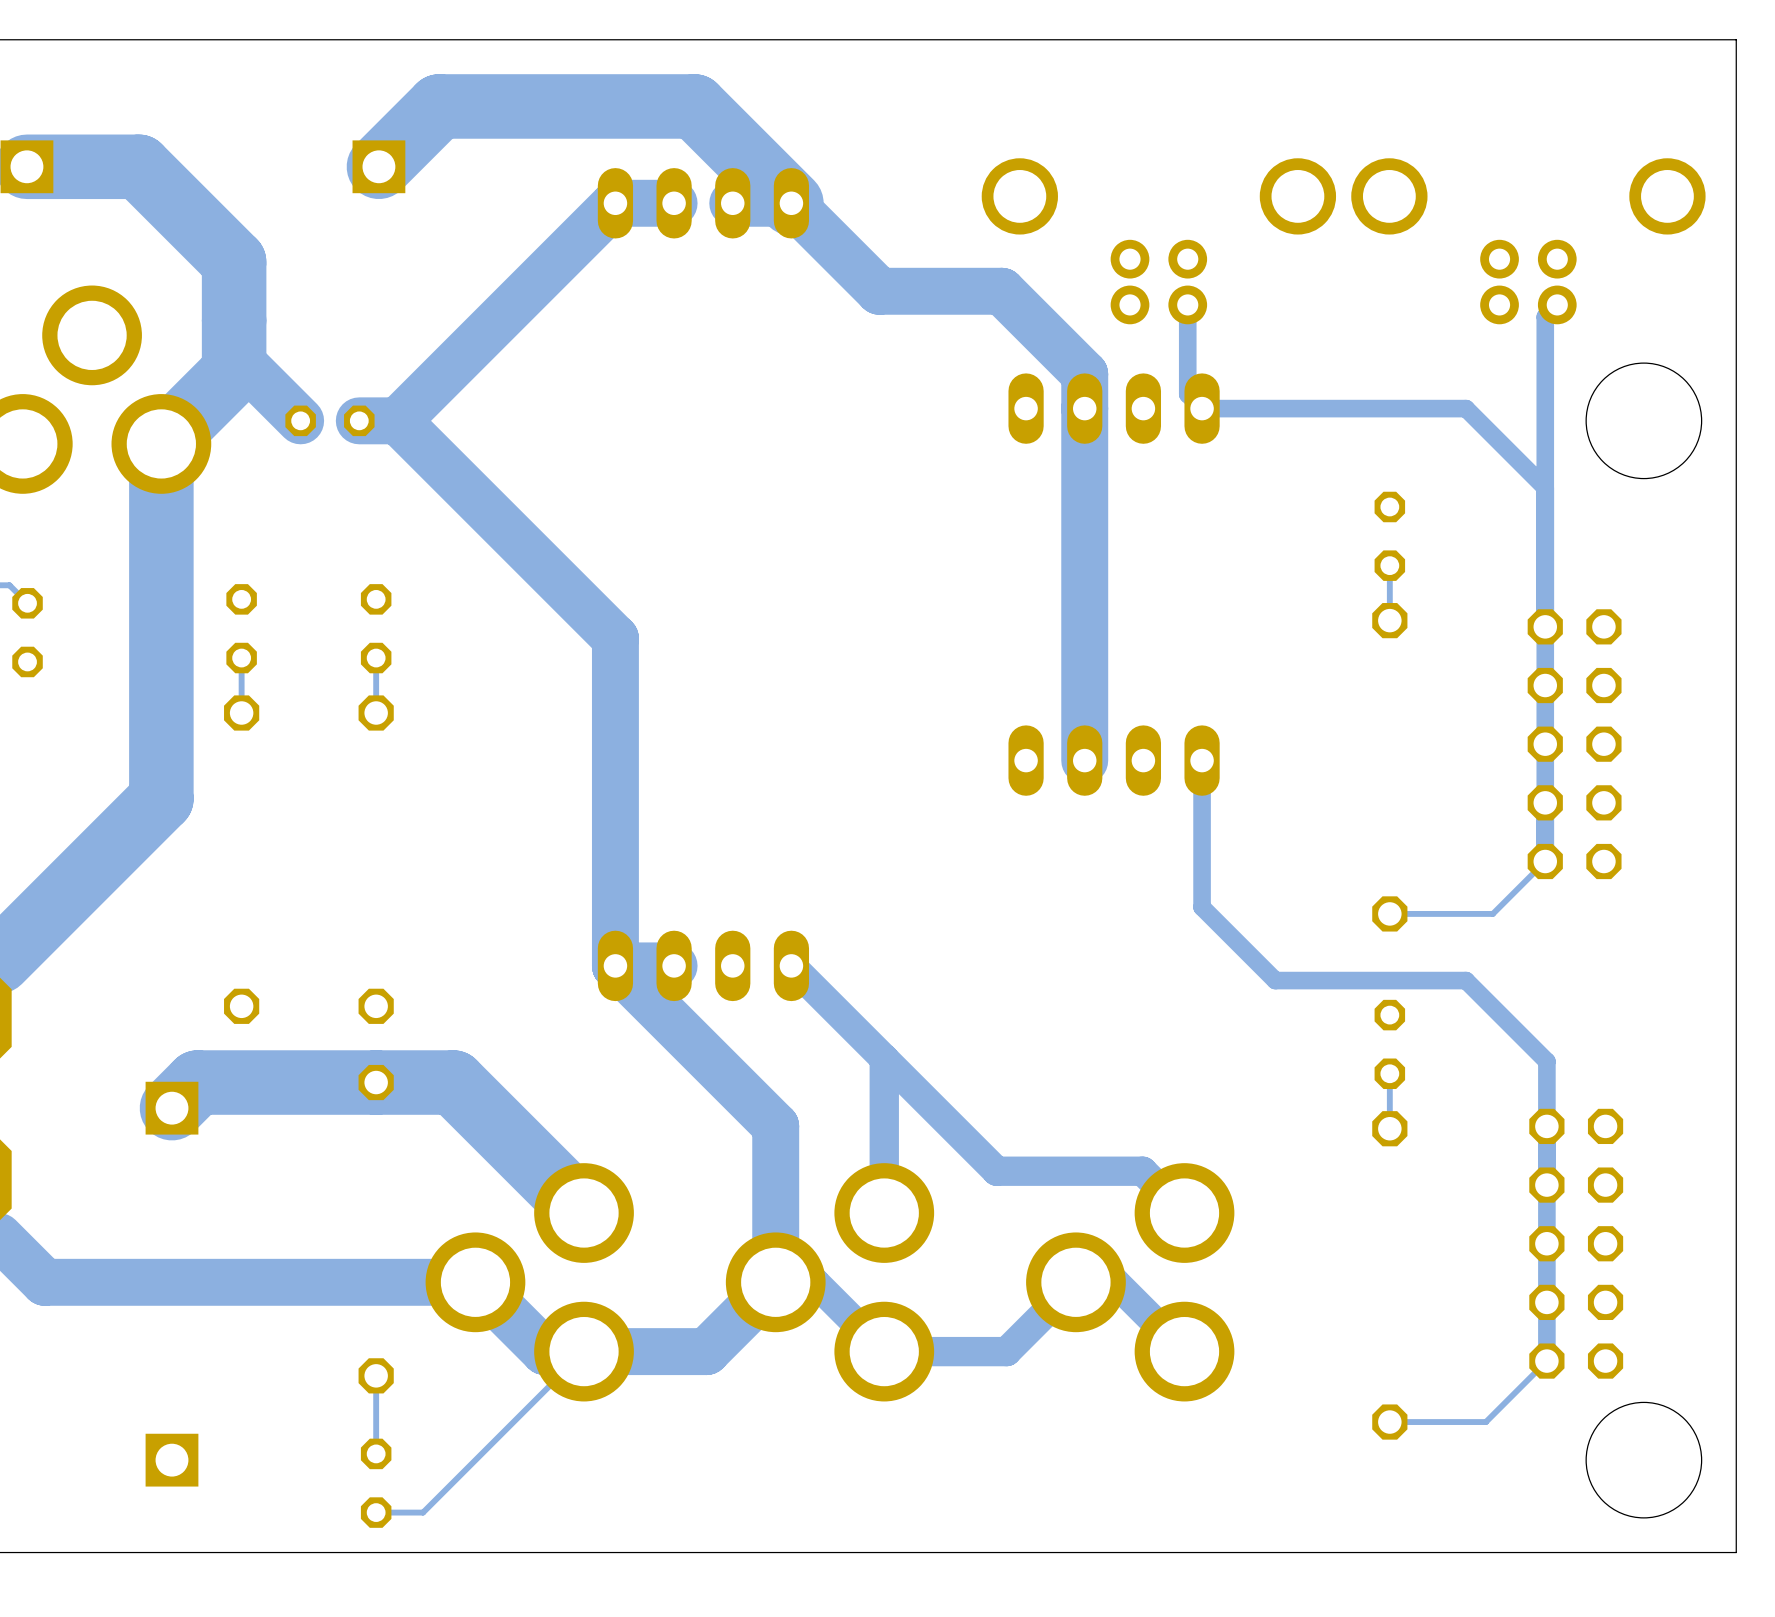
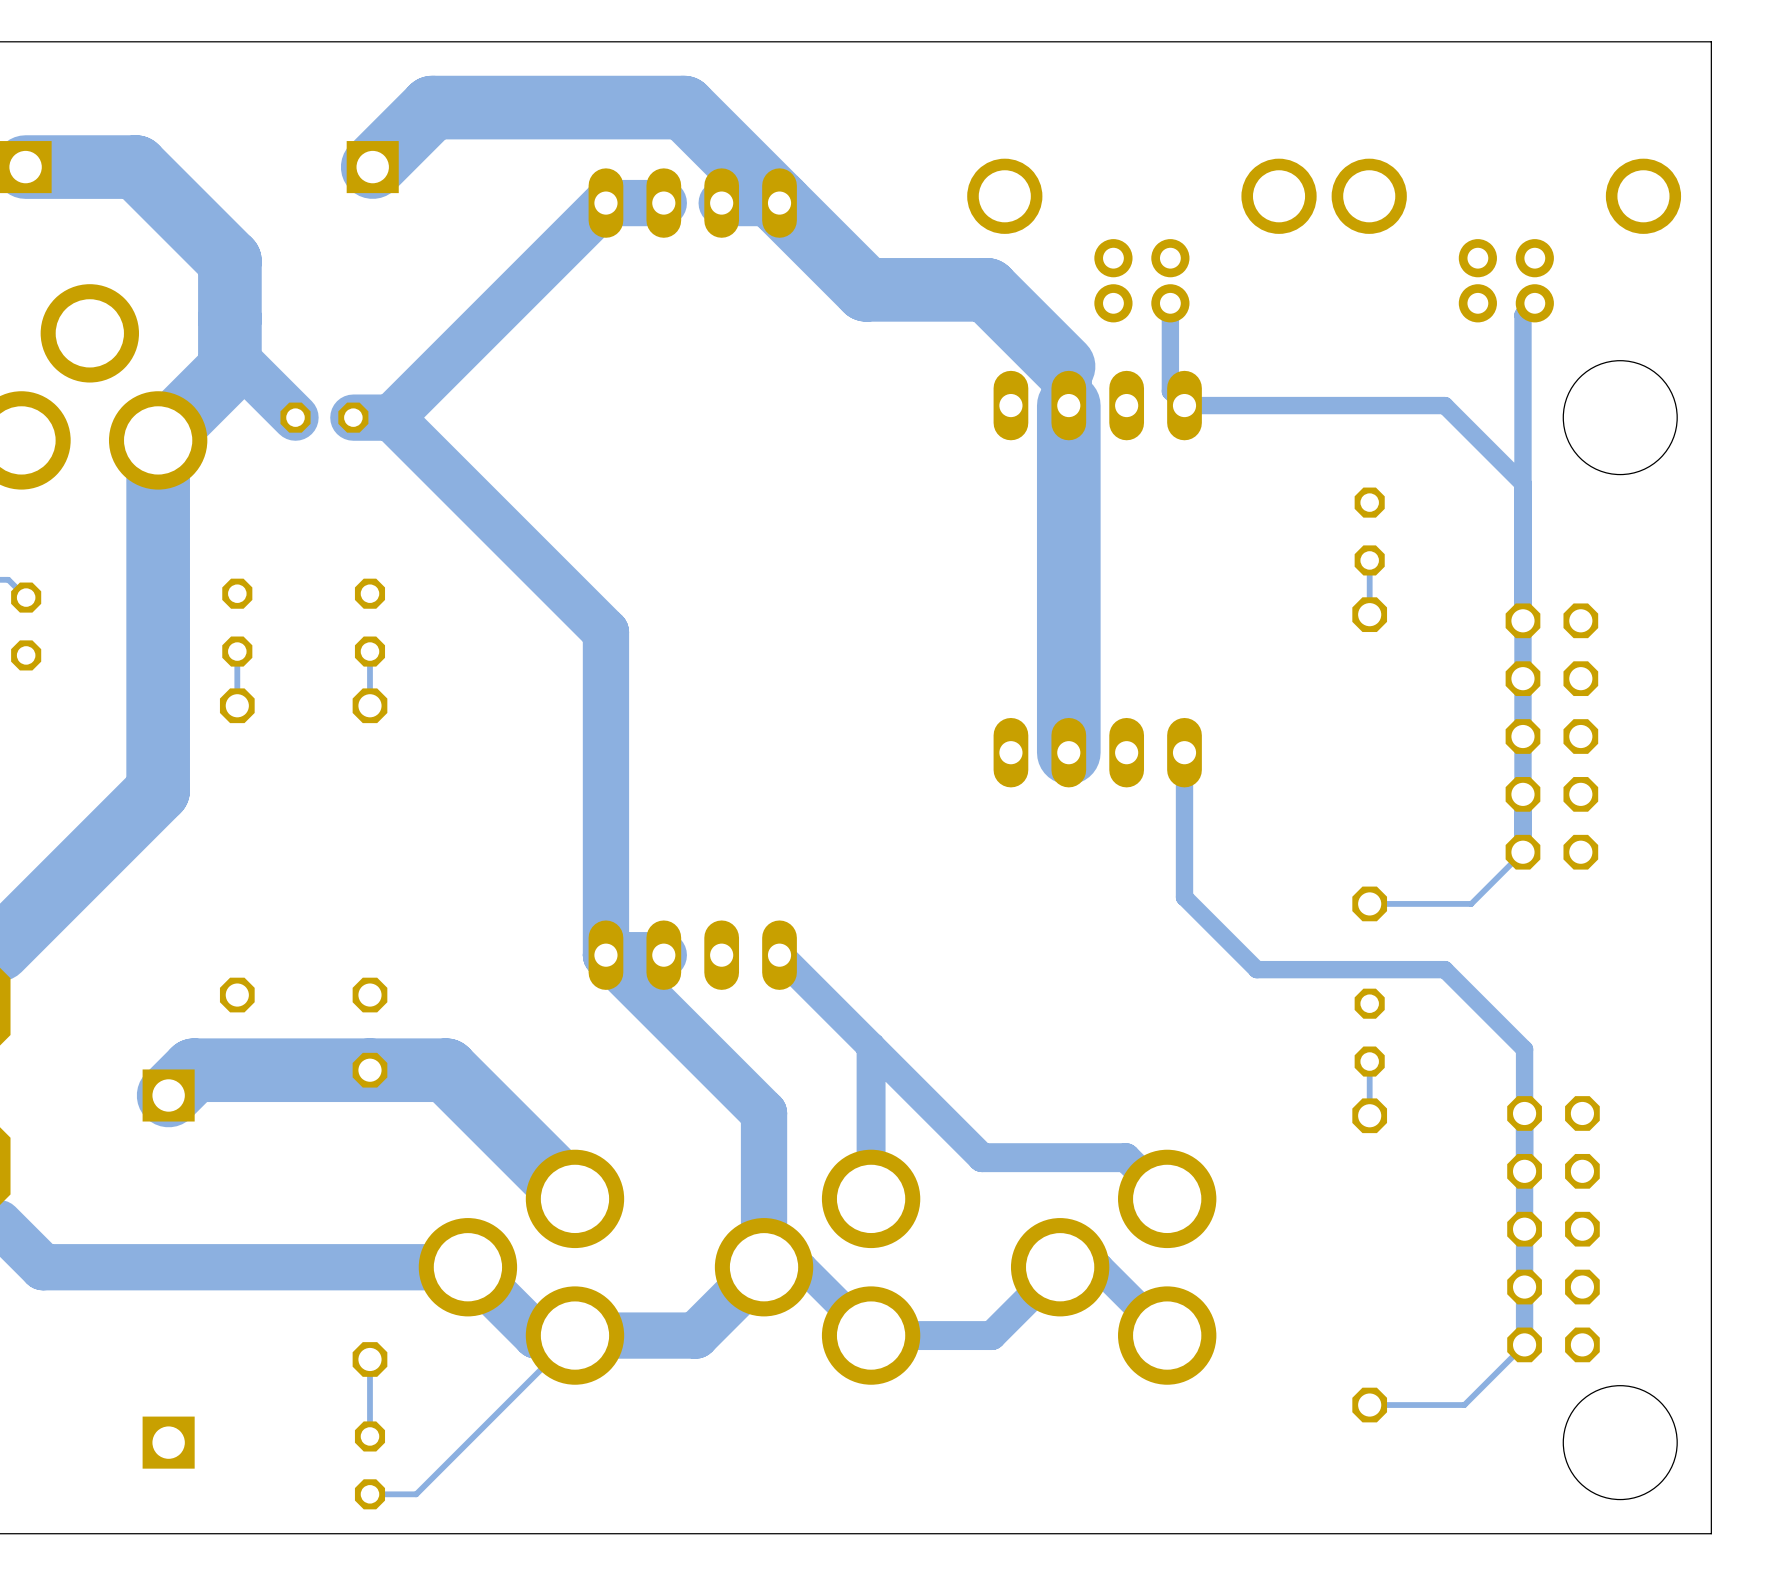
track width: thin (791, 203) (879, 291) (1001, 291) (1079, 368) -> thick (779, 203) (866, 289) (987, 289) (1063, 366)
track width: thin (1084, 408) (1084, 760) -> thick (1068, 405) (1068, 752)

